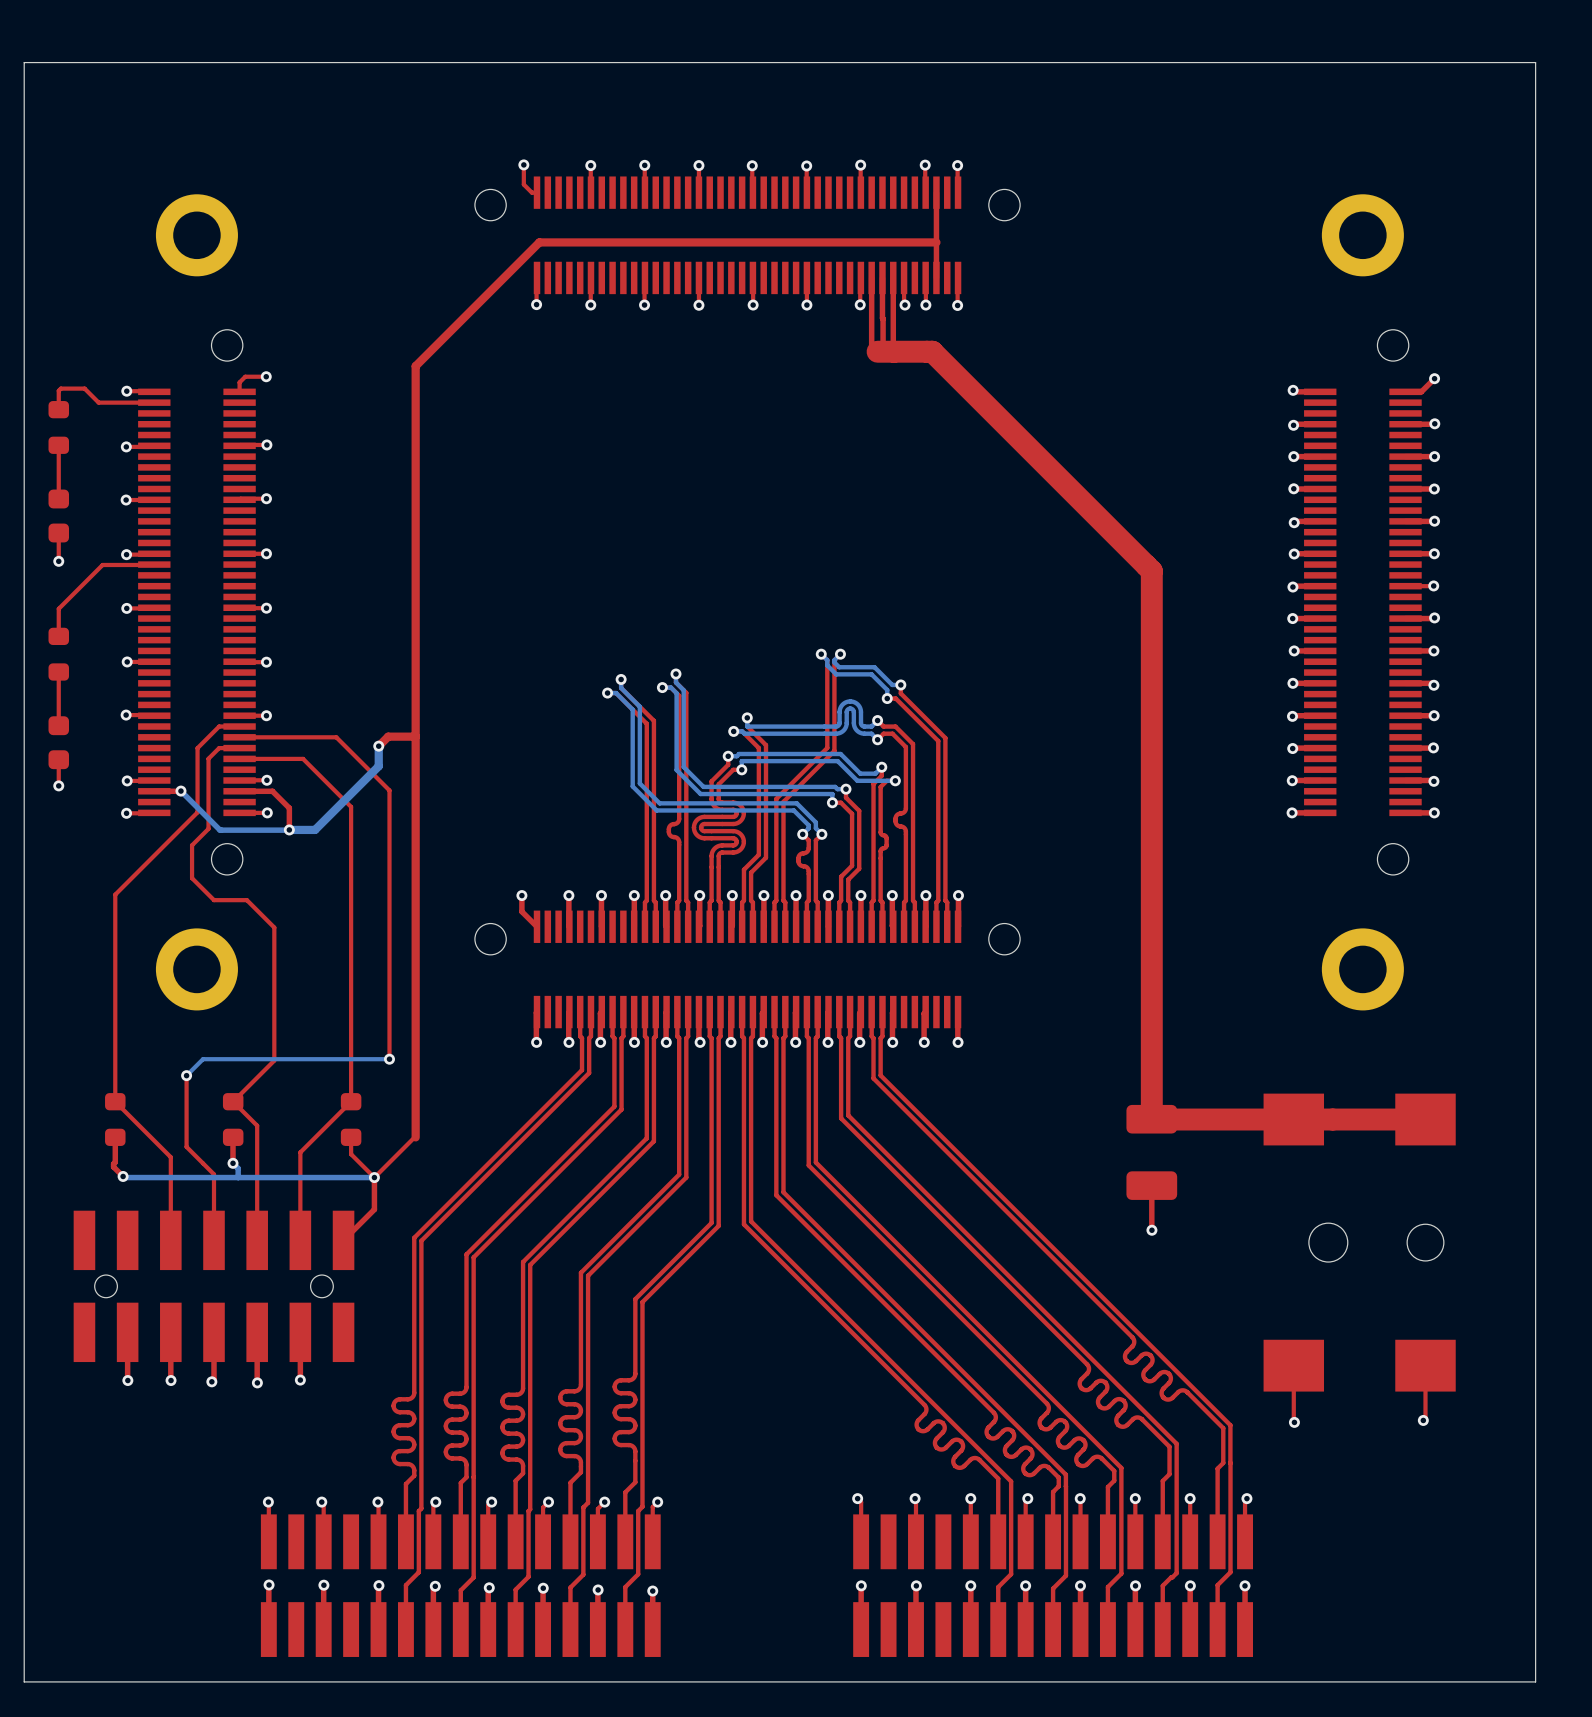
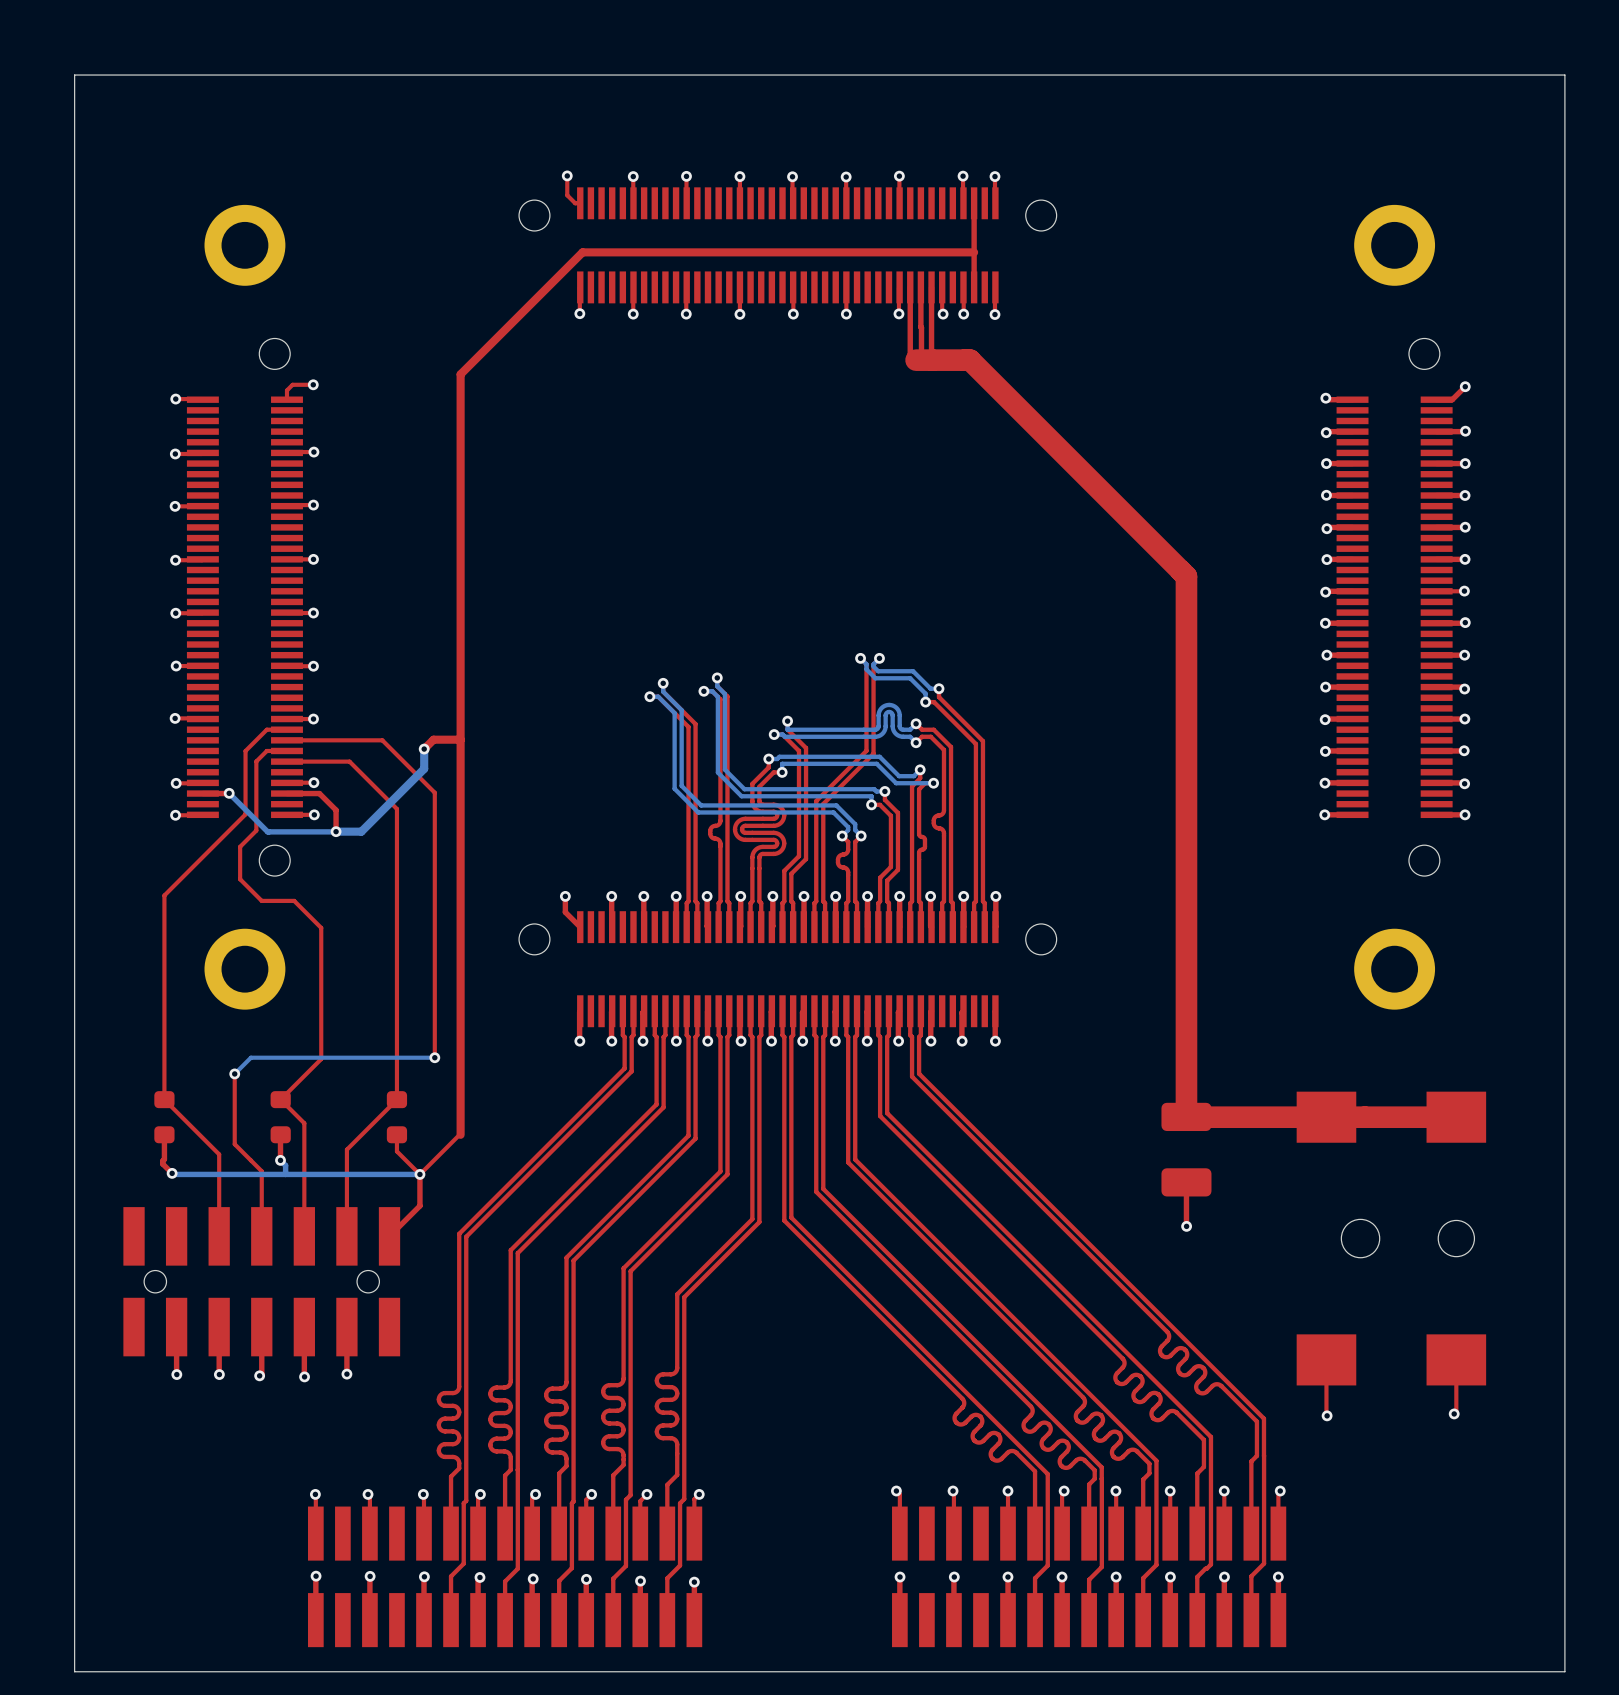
top track: (154, 402) (98, 402) (84, 388) (60, 388) (58, 390) (58, 409) -> none
part: (58, 427) -> none
top track: (58, 445) (58, 498) -> none
part: (58, 515) -> none
top track: (58, 533) (58, 561) -> none
via: (58, 561) -> none
top track: (154, 564) (102, 564) (58, 608) (58, 636) -> none
part: (58, 654) -> none
top track: (58, 671) (58, 725) -> none
part: (58, 742) -> none
top track: (58, 759) (58, 785) -> none
via: (58, 785) -> none

